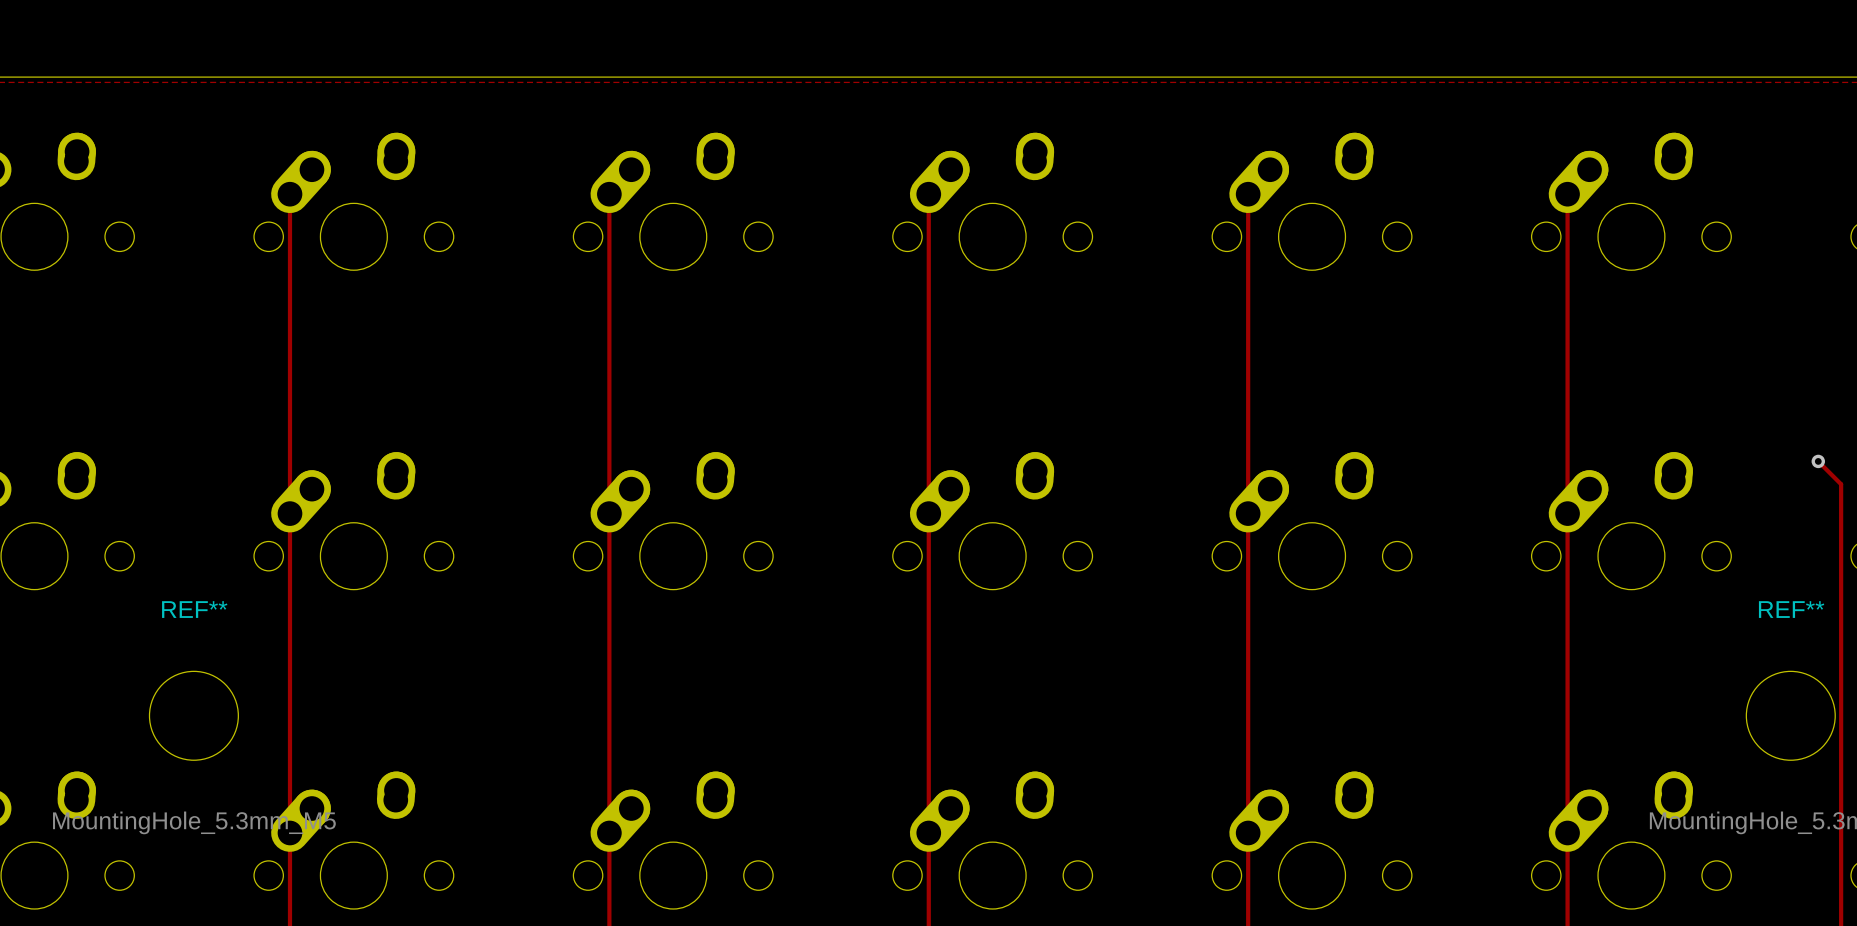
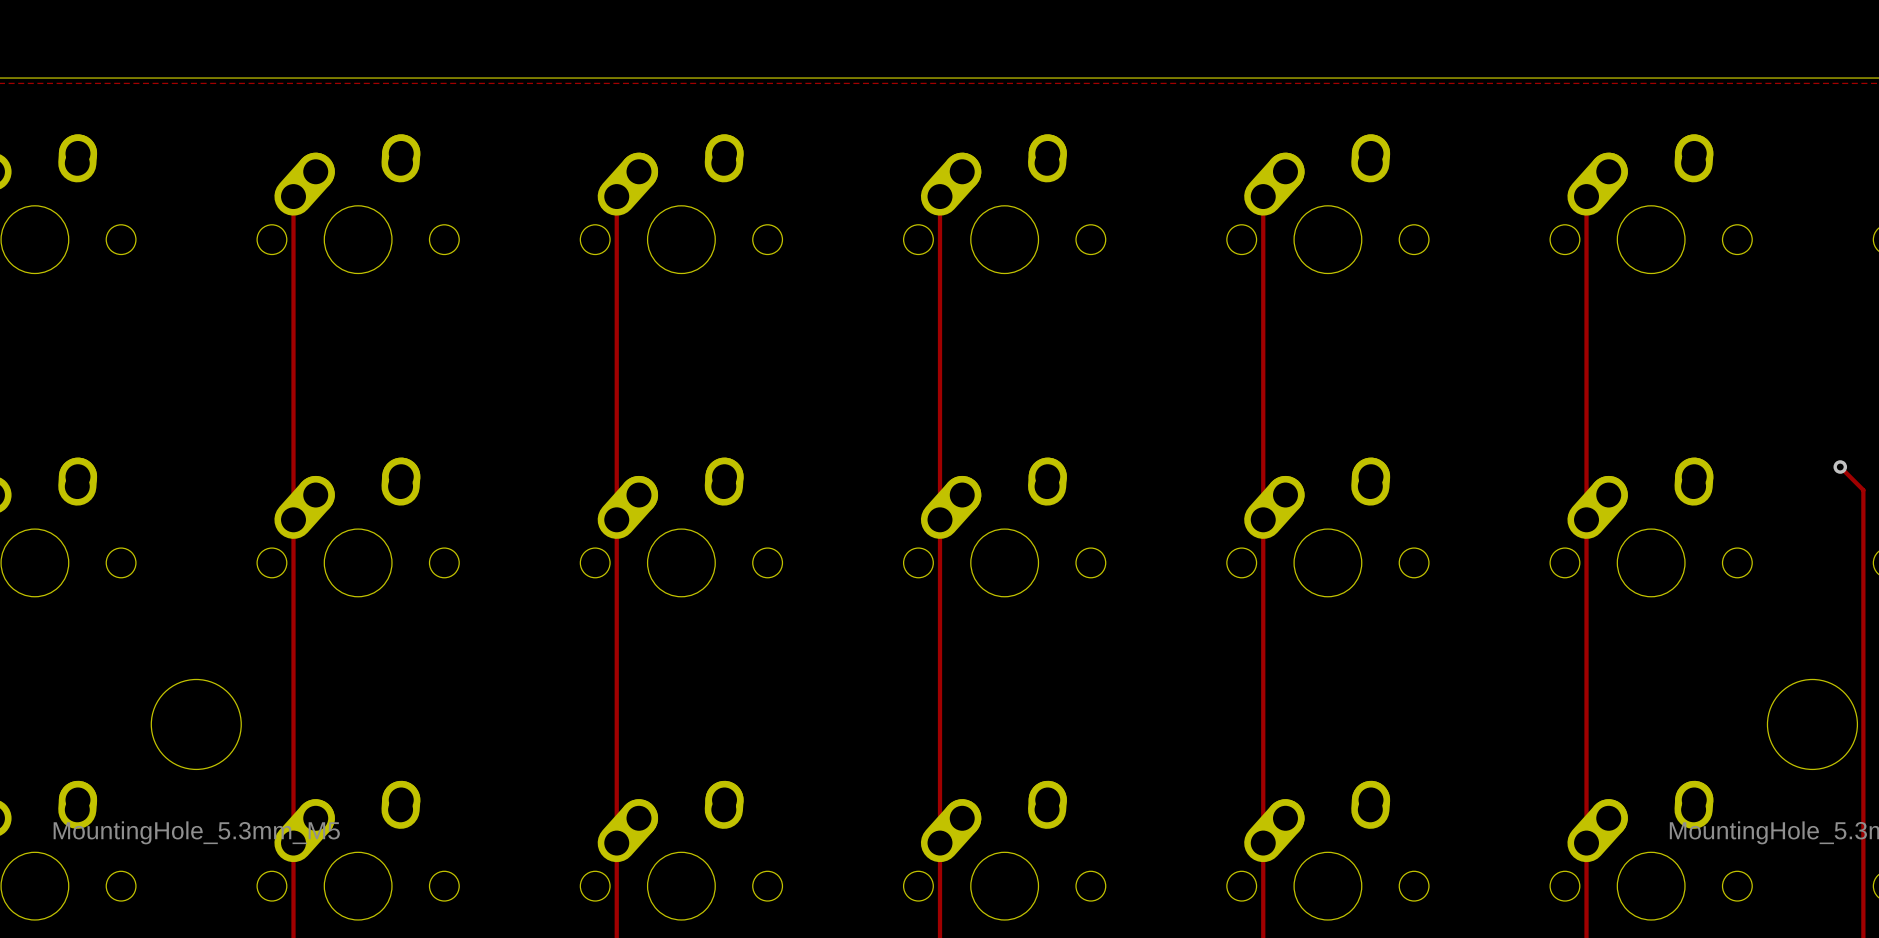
REF** name: REF** (194, 609) -> none
REF** name: REF** (1791, 609) -> none

